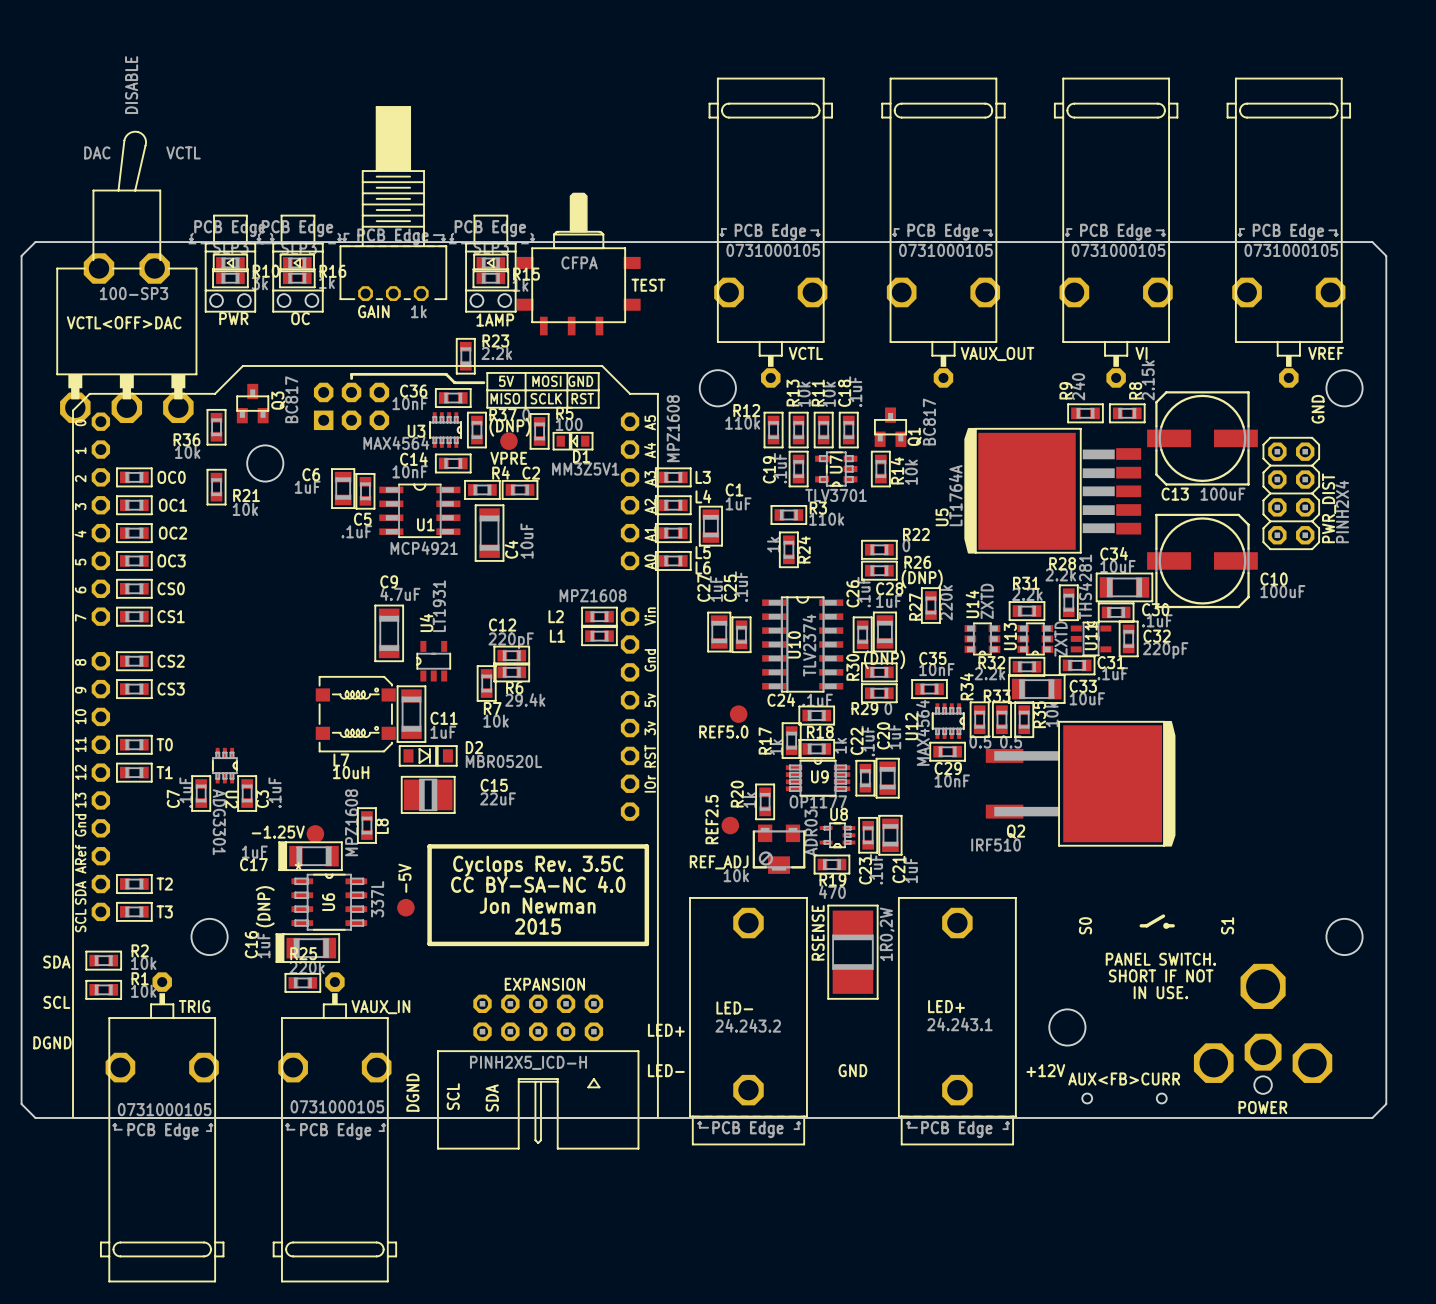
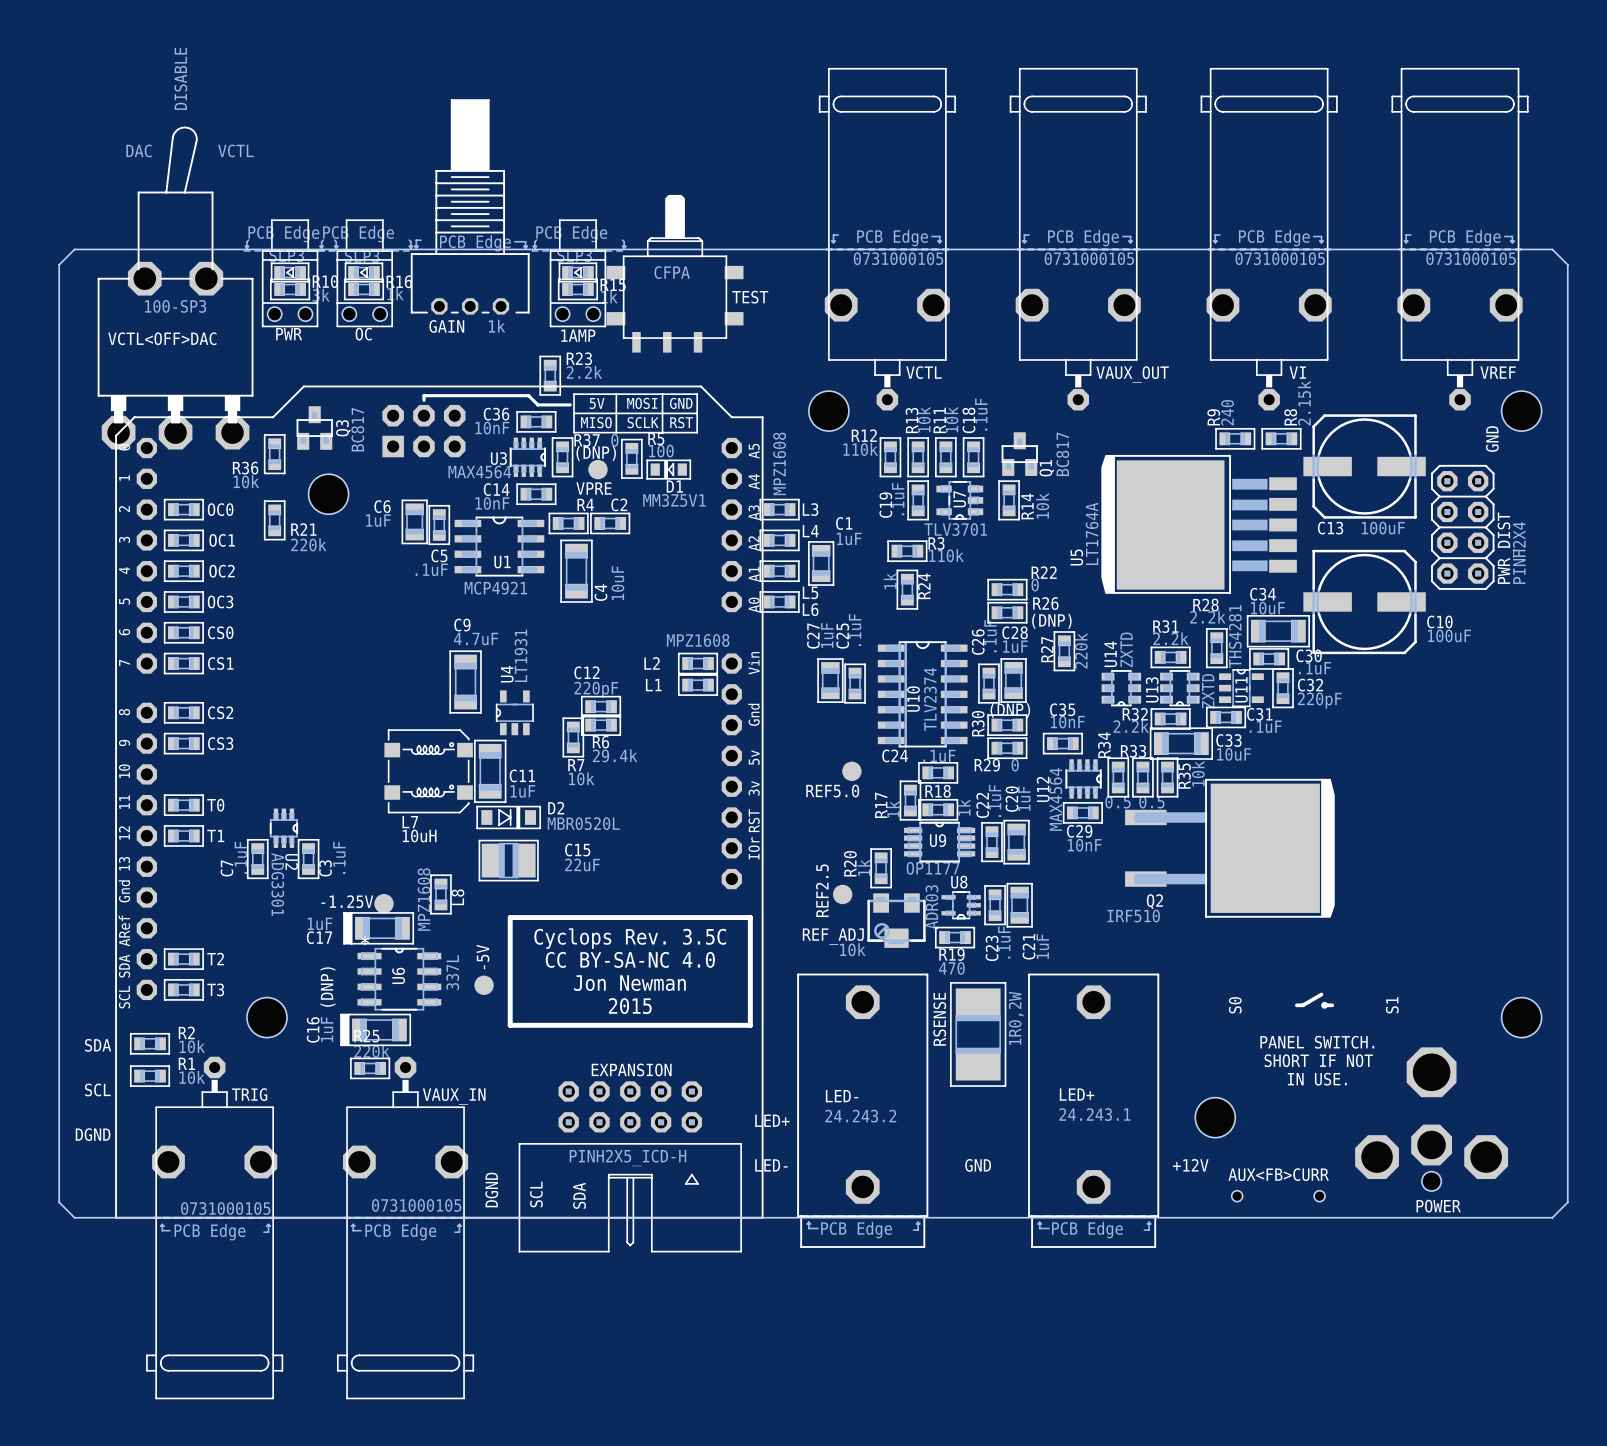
R21 value: 10k (245, 509) -> 220k (308, 544)

